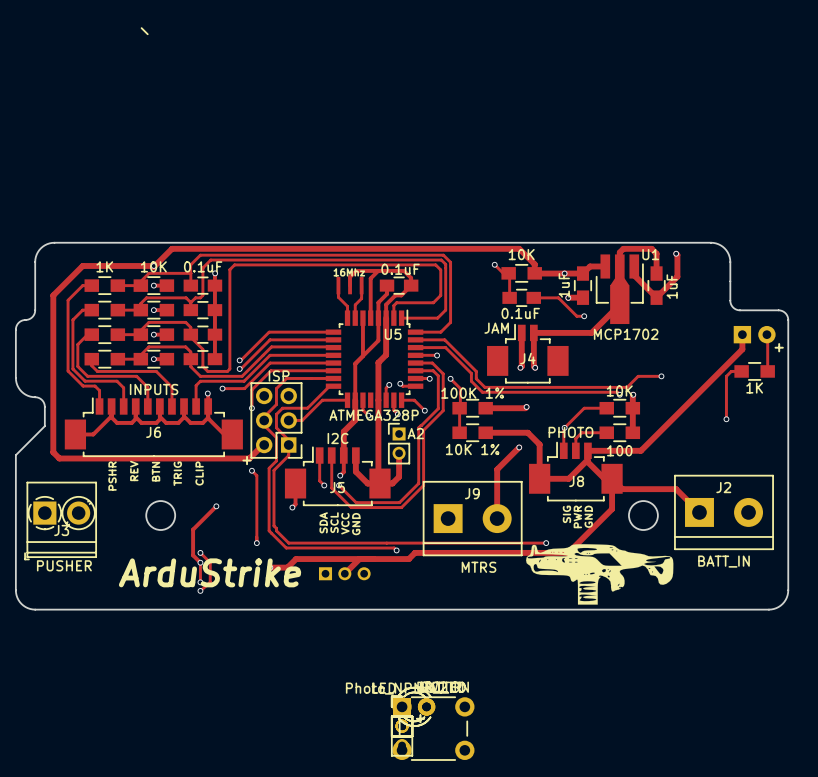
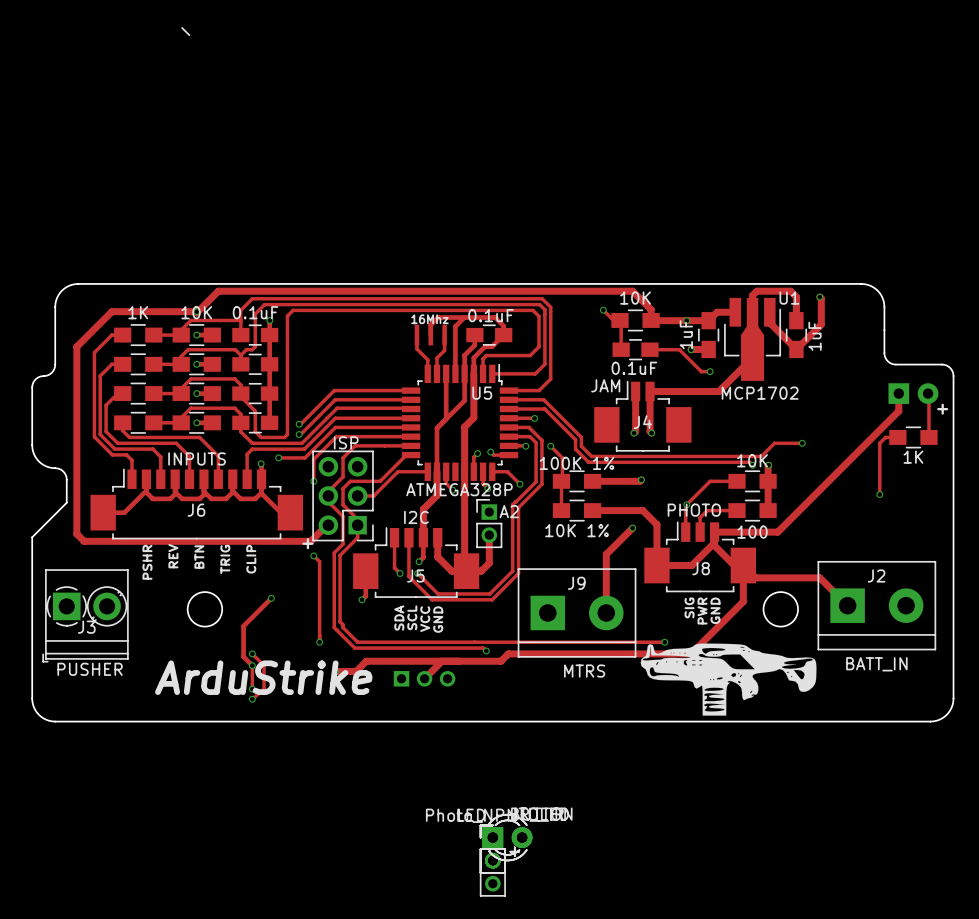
part: (433, 728) -> none

